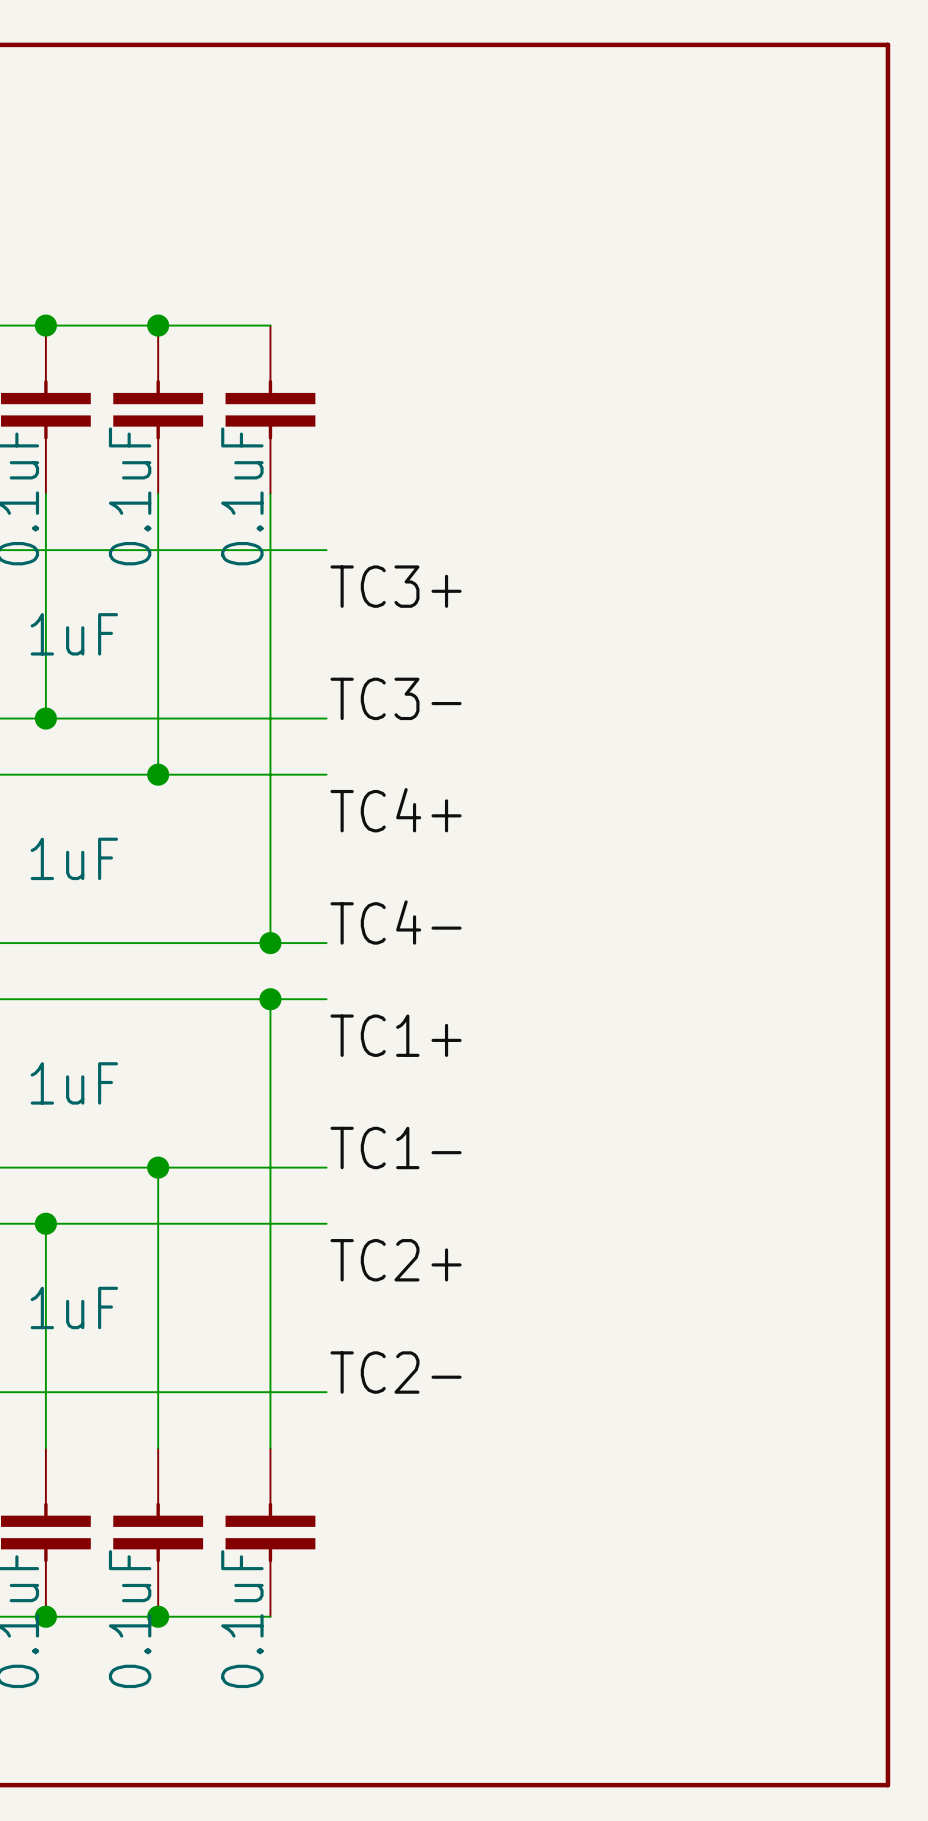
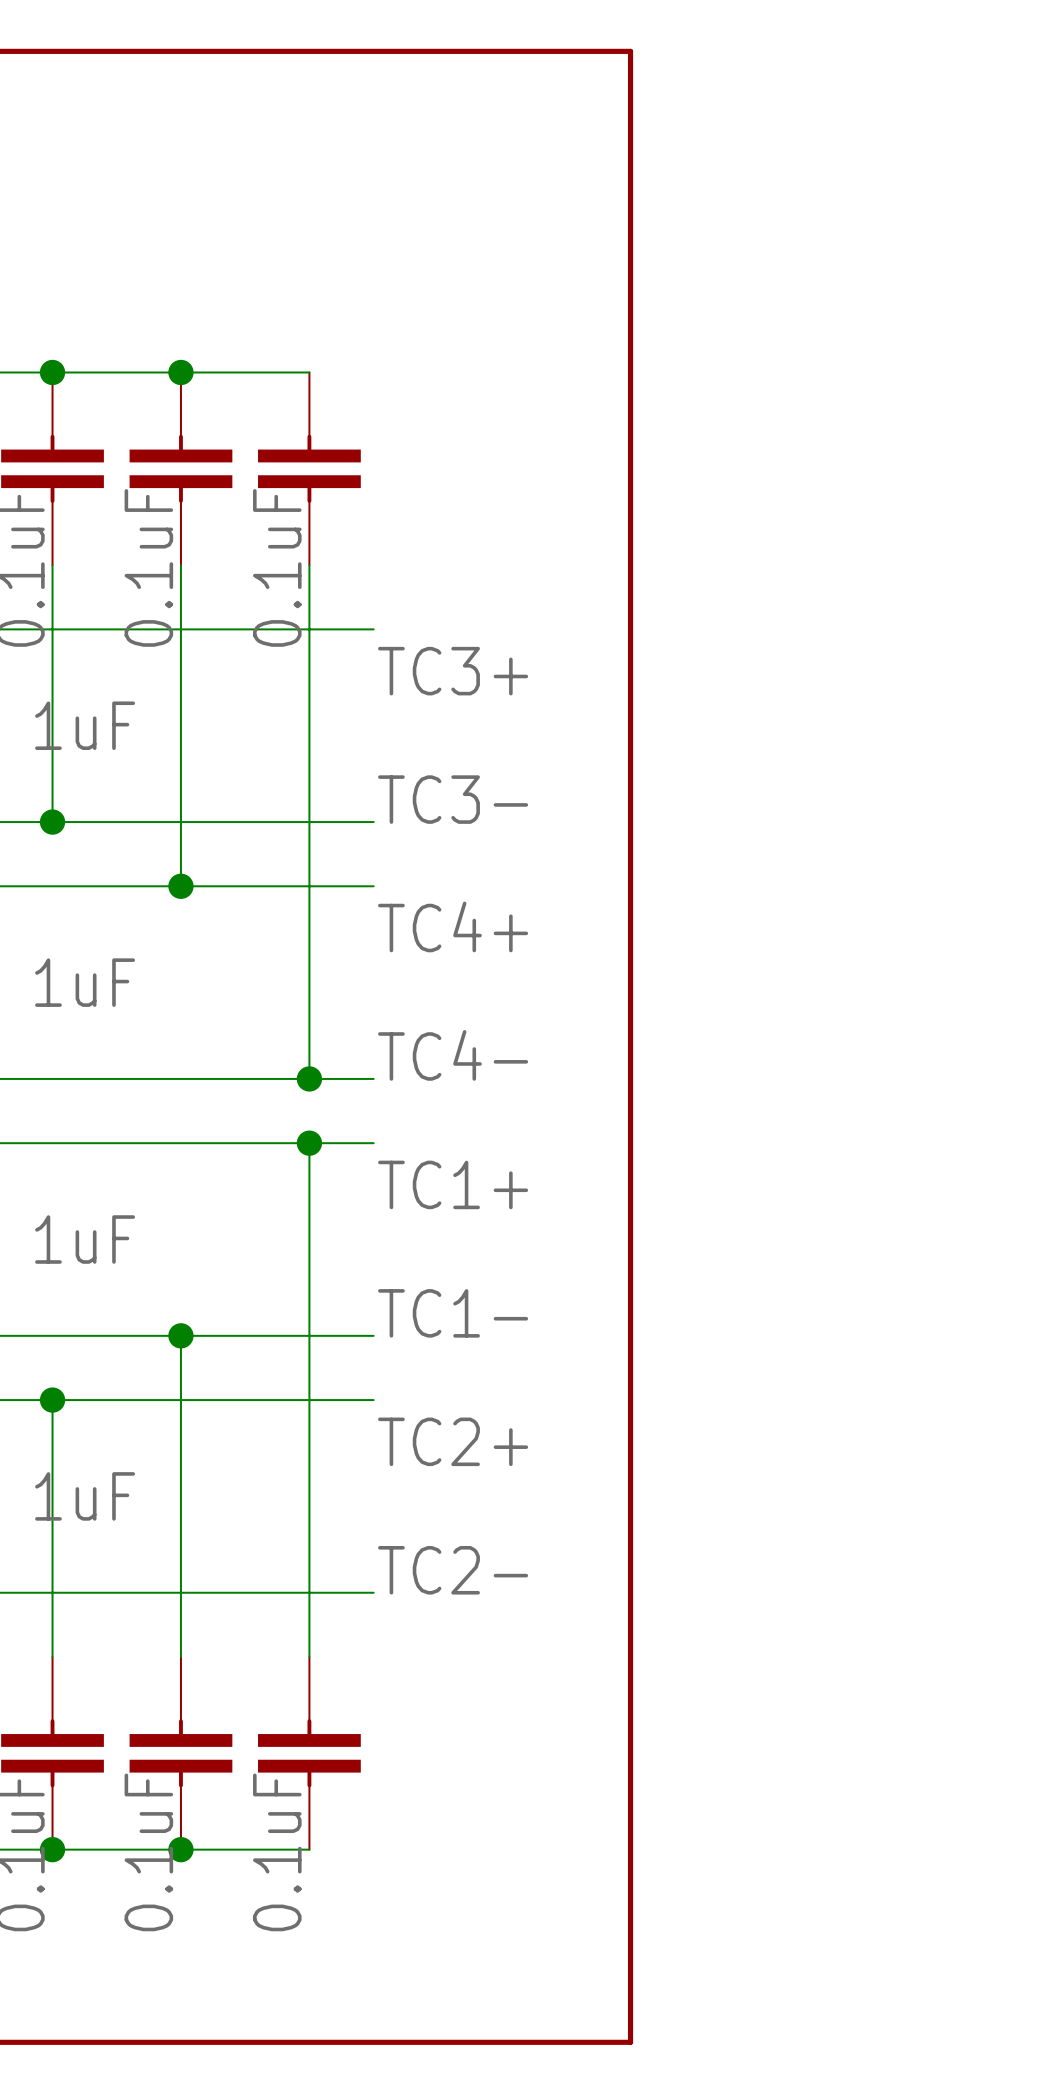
line: (551, 44) (887, 44) (887, 1785) (551, 1785) -> (630, 51) (630, 2042)

